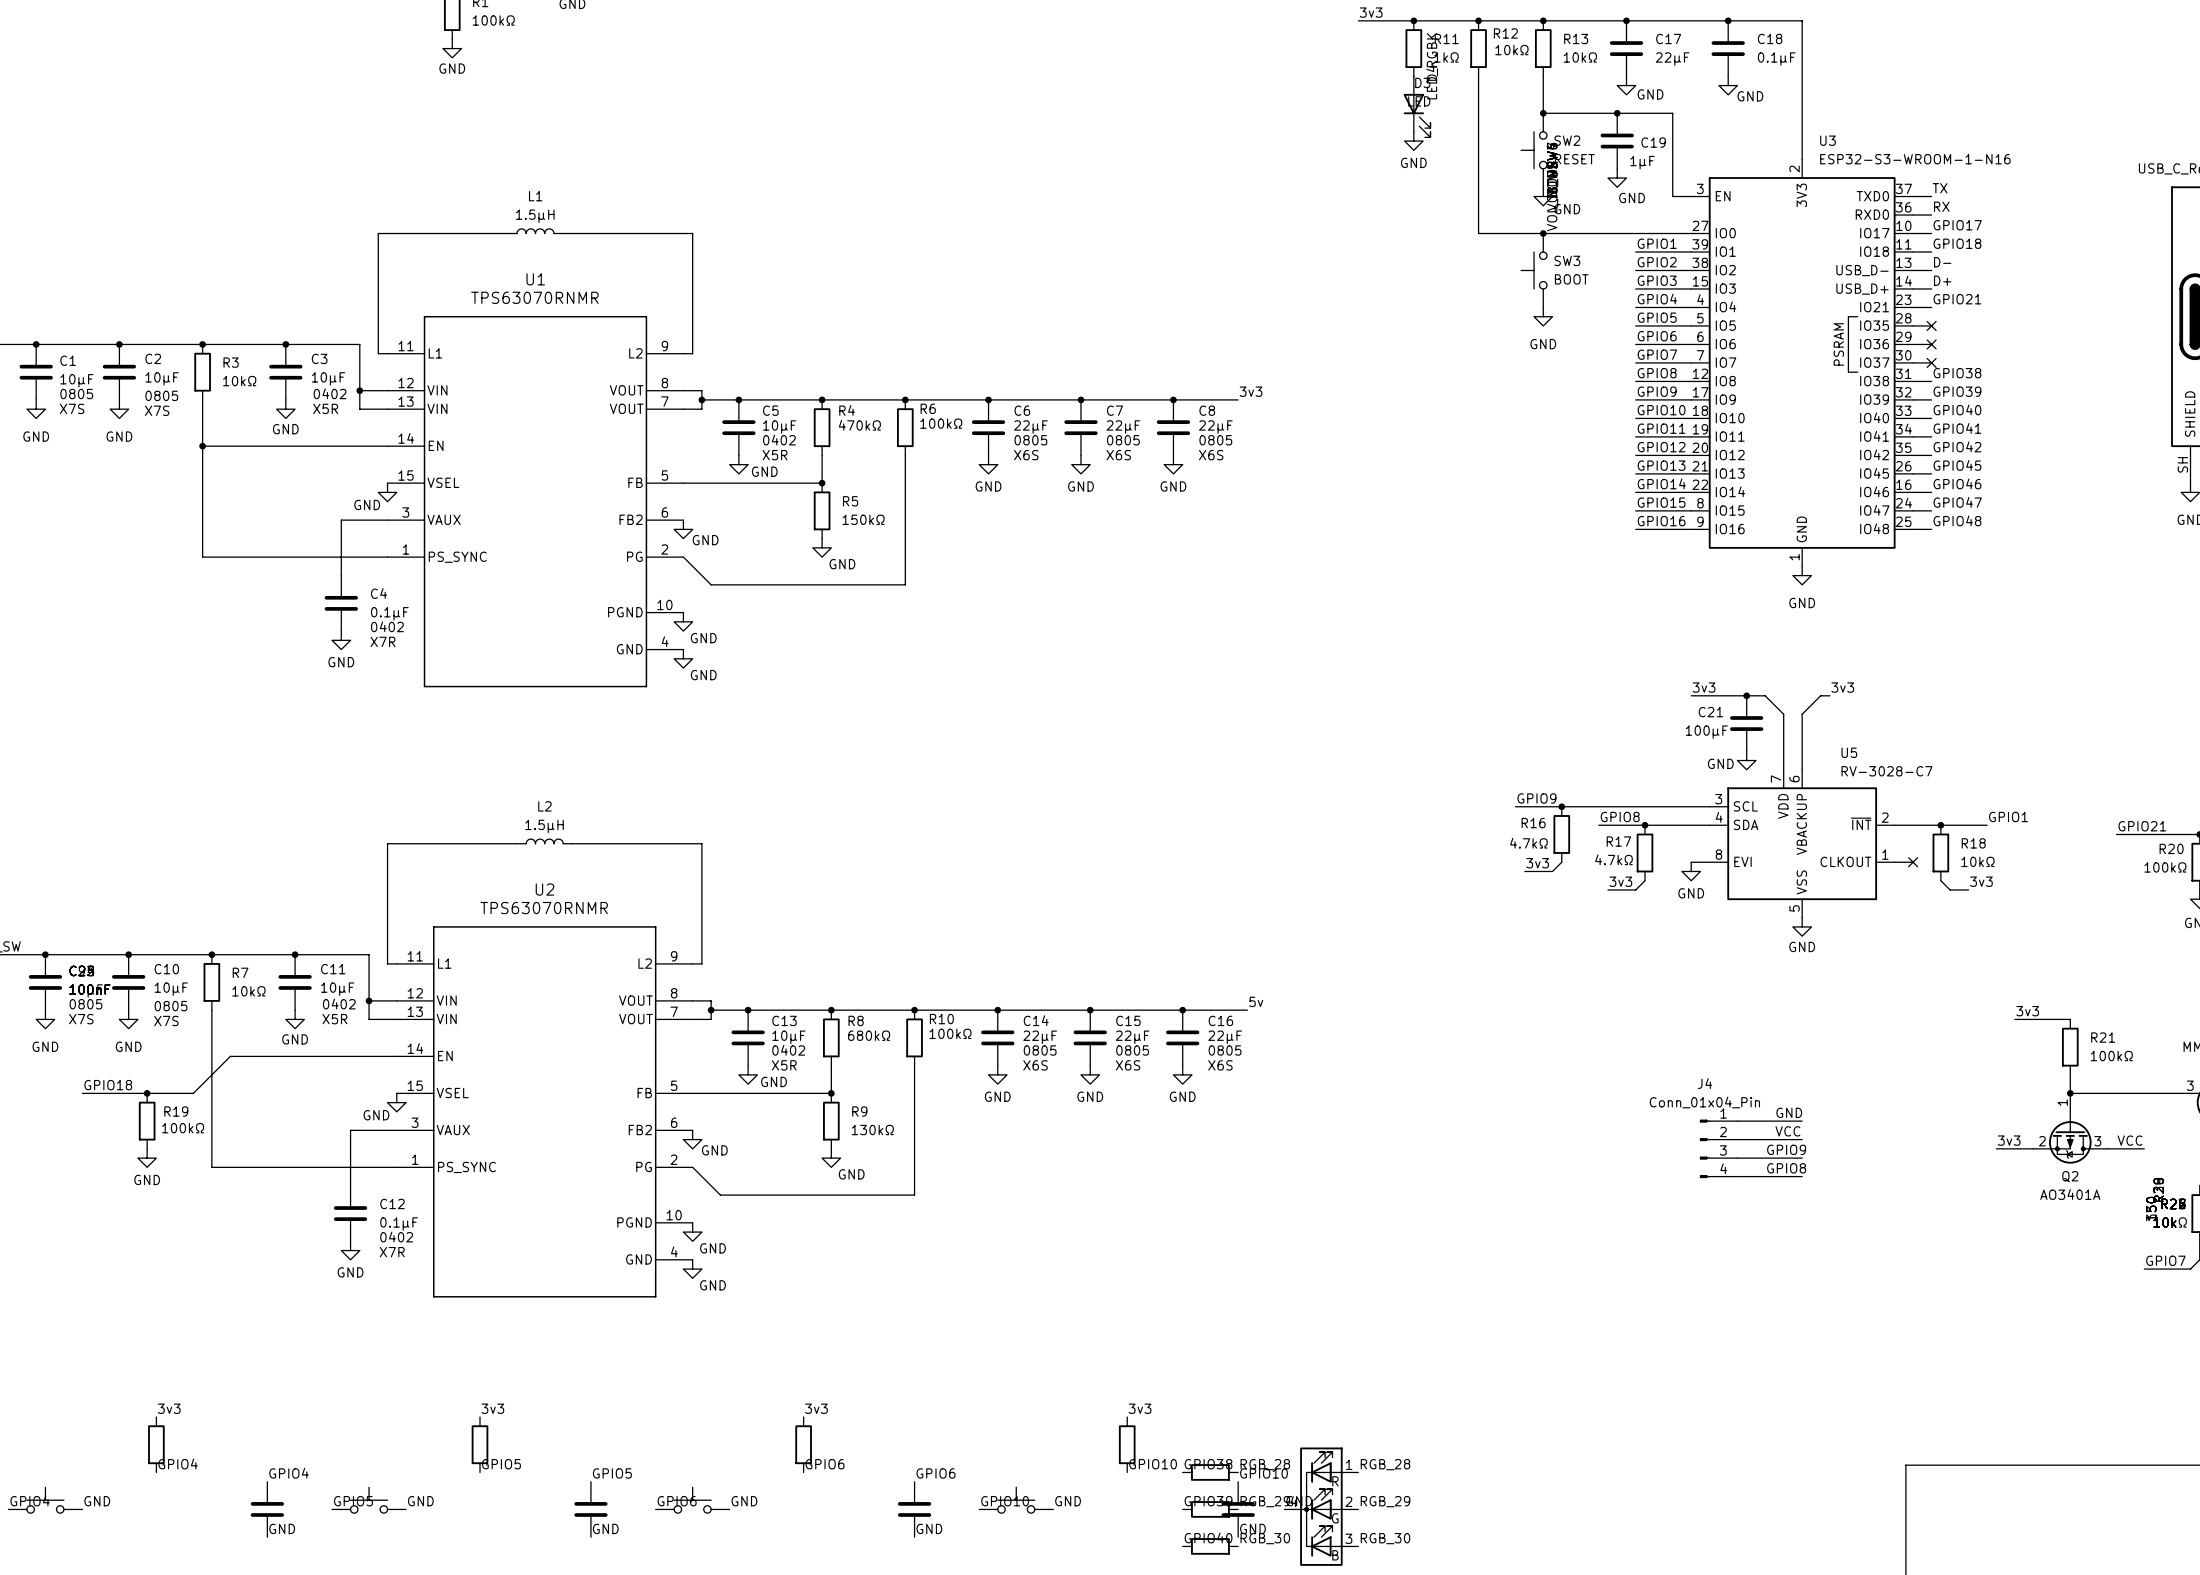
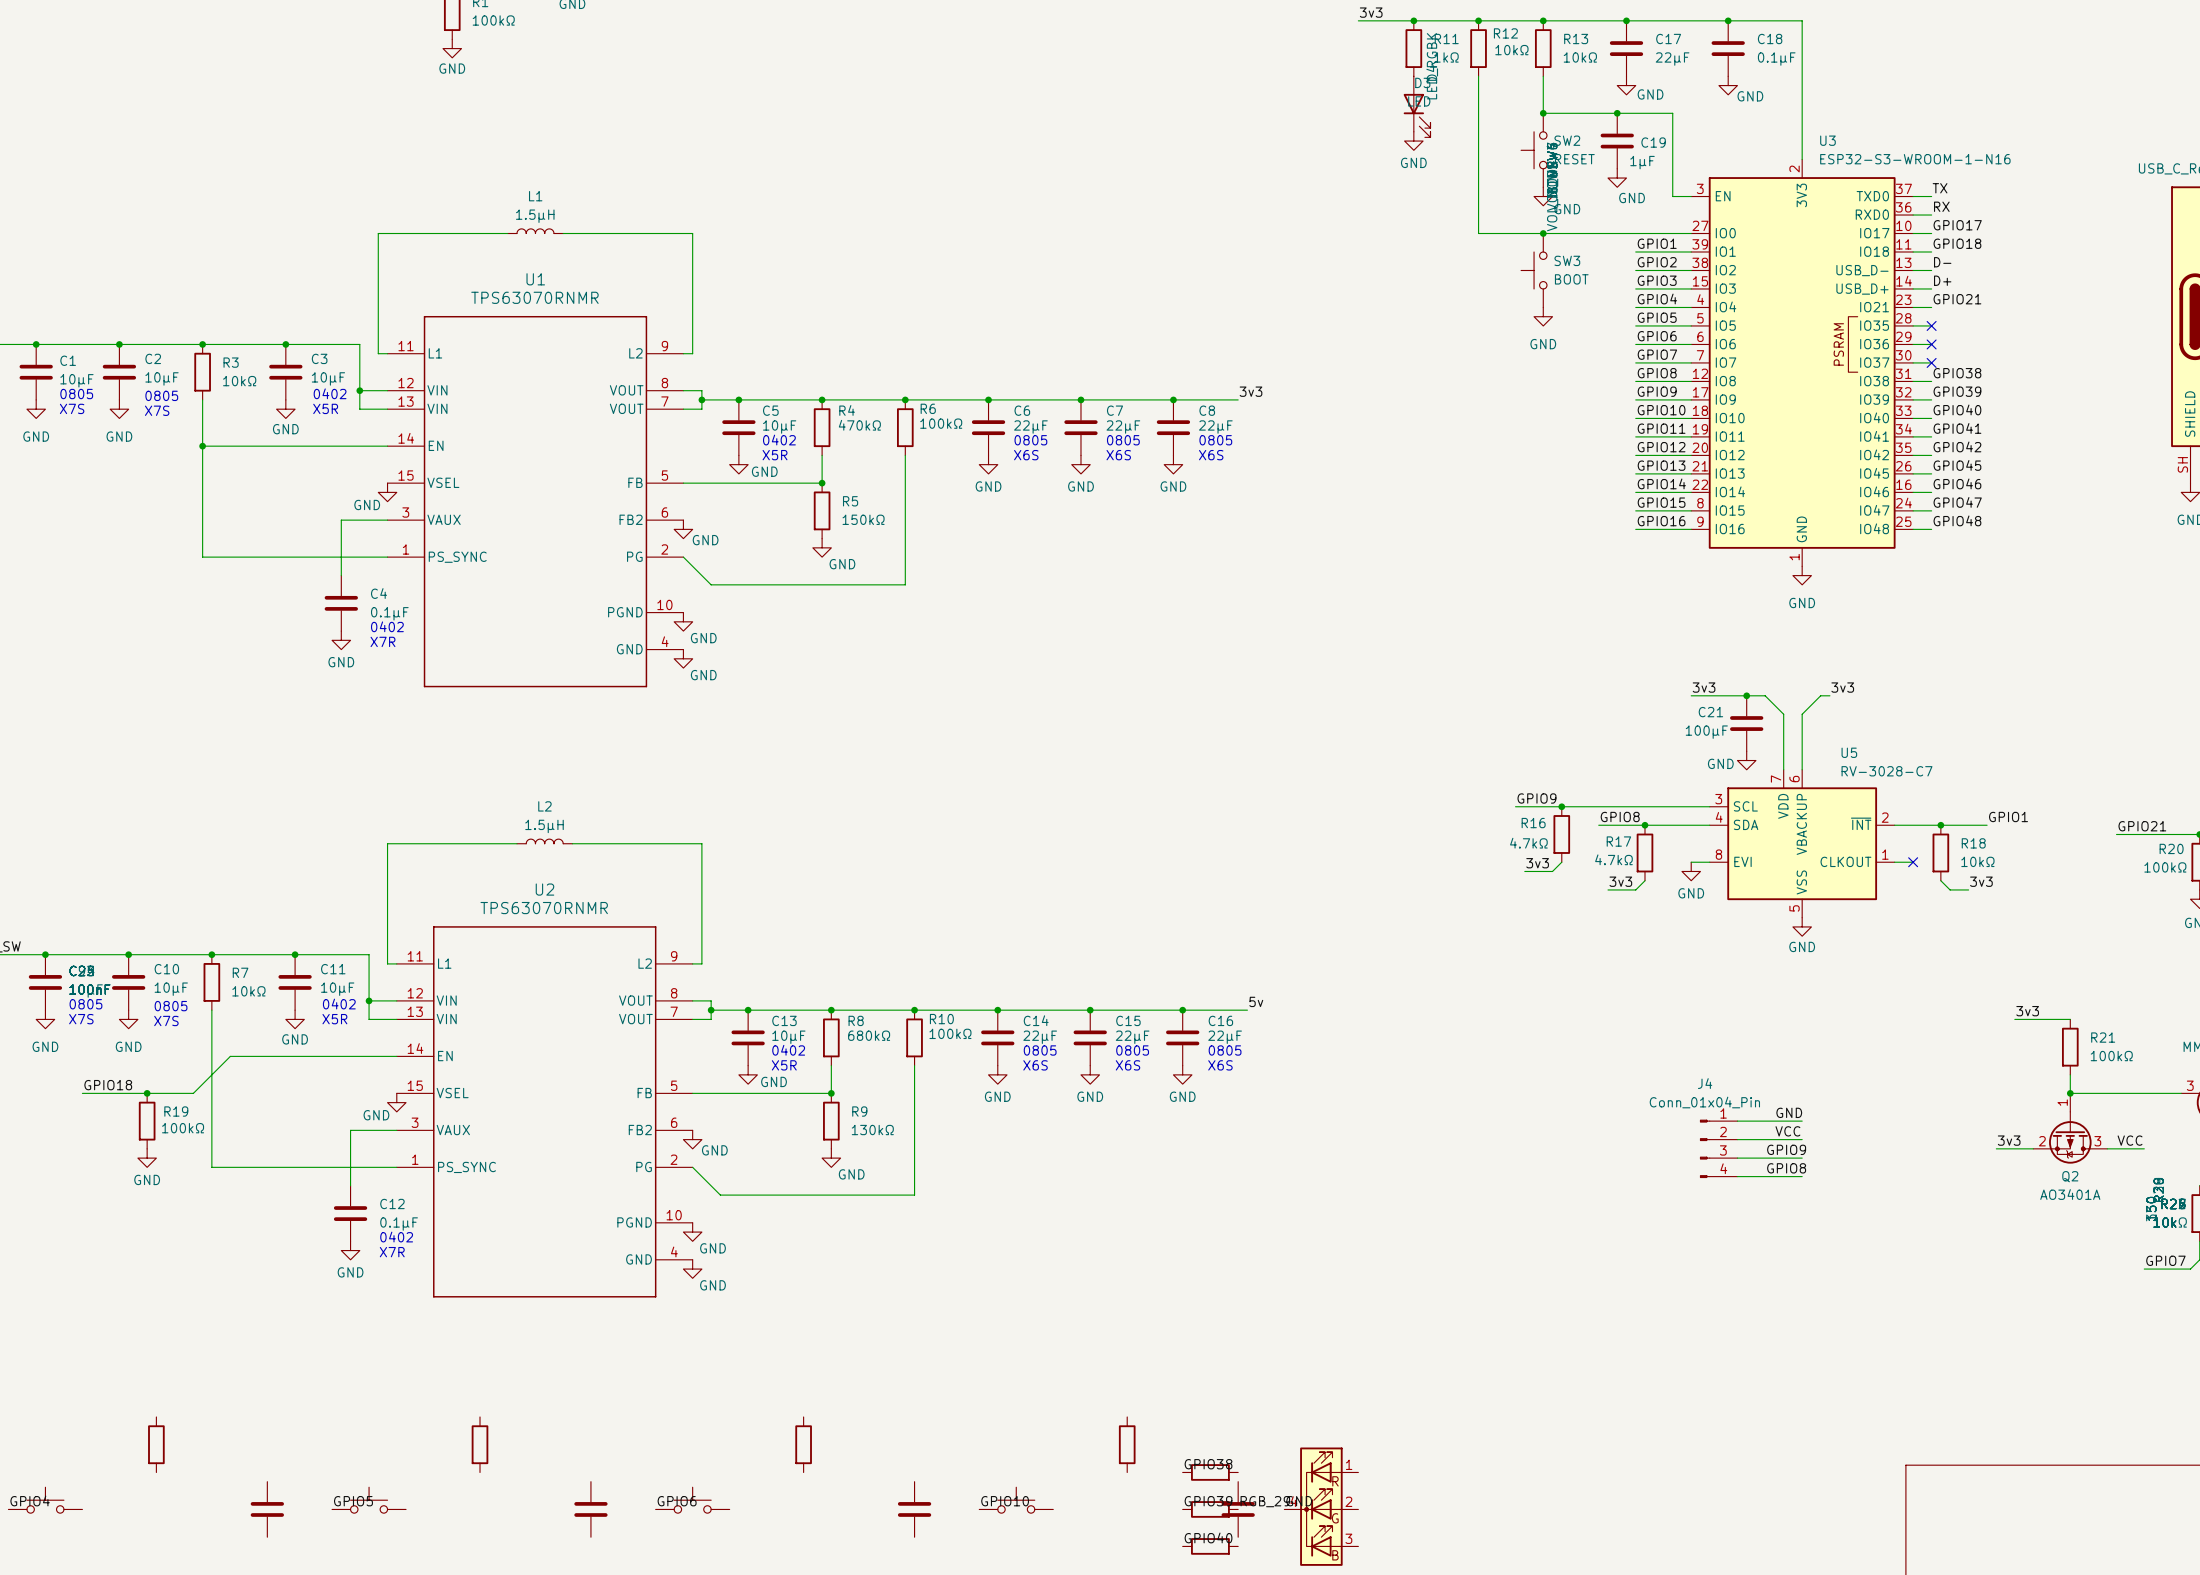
label: 3v3 (169, 1408) -> none
label: 3v3 (492, 1408) -> none
label: 3v3 (816, 1408) -> none
label: 3v3 (1140, 1408) -> none
label: GPIO4 (178, 1463) -> none
label: GPIO5 (501, 1464) -> none
label: GPIO6 (825, 1464) -> none
label: GPIO10 (1153, 1464) -> none
label: RGB_28 (1265, 1464) -> none
label: RGB_28 (1385, 1464) -> none
label: GPIO4 (288, 1473) -> none
label: GPIO5 (612, 1473) -> none
label: GPIO6 (935, 1473) -> none
label: GPIO10 (1263, 1473) -> none
label: GND (97, 1501) -> none
label: GND (420, 1501) -> none
label: GND (744, 1501) -> none
label: GND (1068, 1501) -> none
label: RGB_29 (1385, 1501) -> none
label: GND (282, 1528) -> none
label: GND (605, 1528) -> none
label: GND (929, 1528) -> none
label: GND (1252, 1528) -> none
label: RGB_30 (1265, 1538) -> none
label: RGB_30 (1385, 1538) -> none

